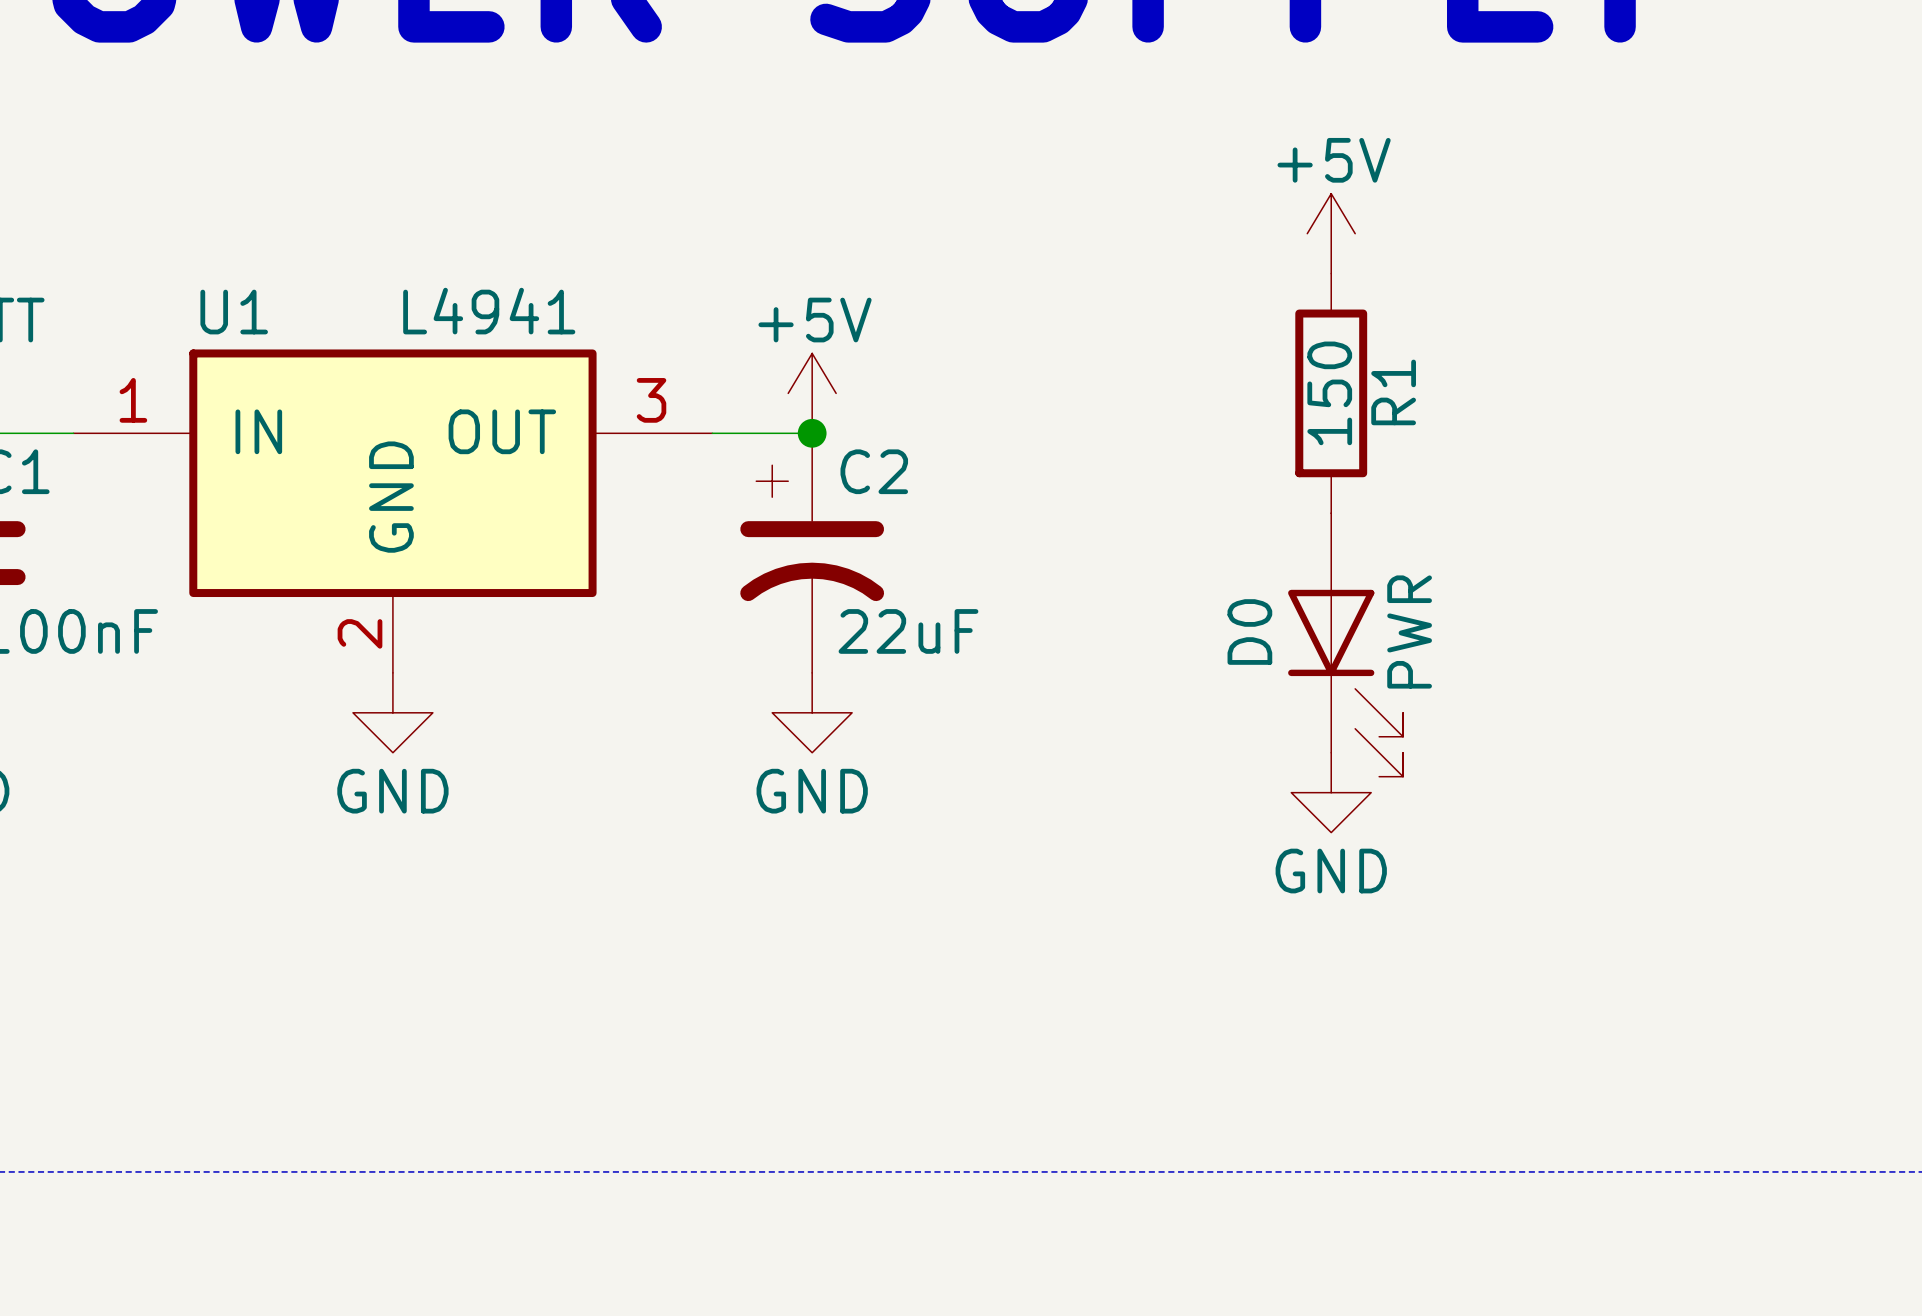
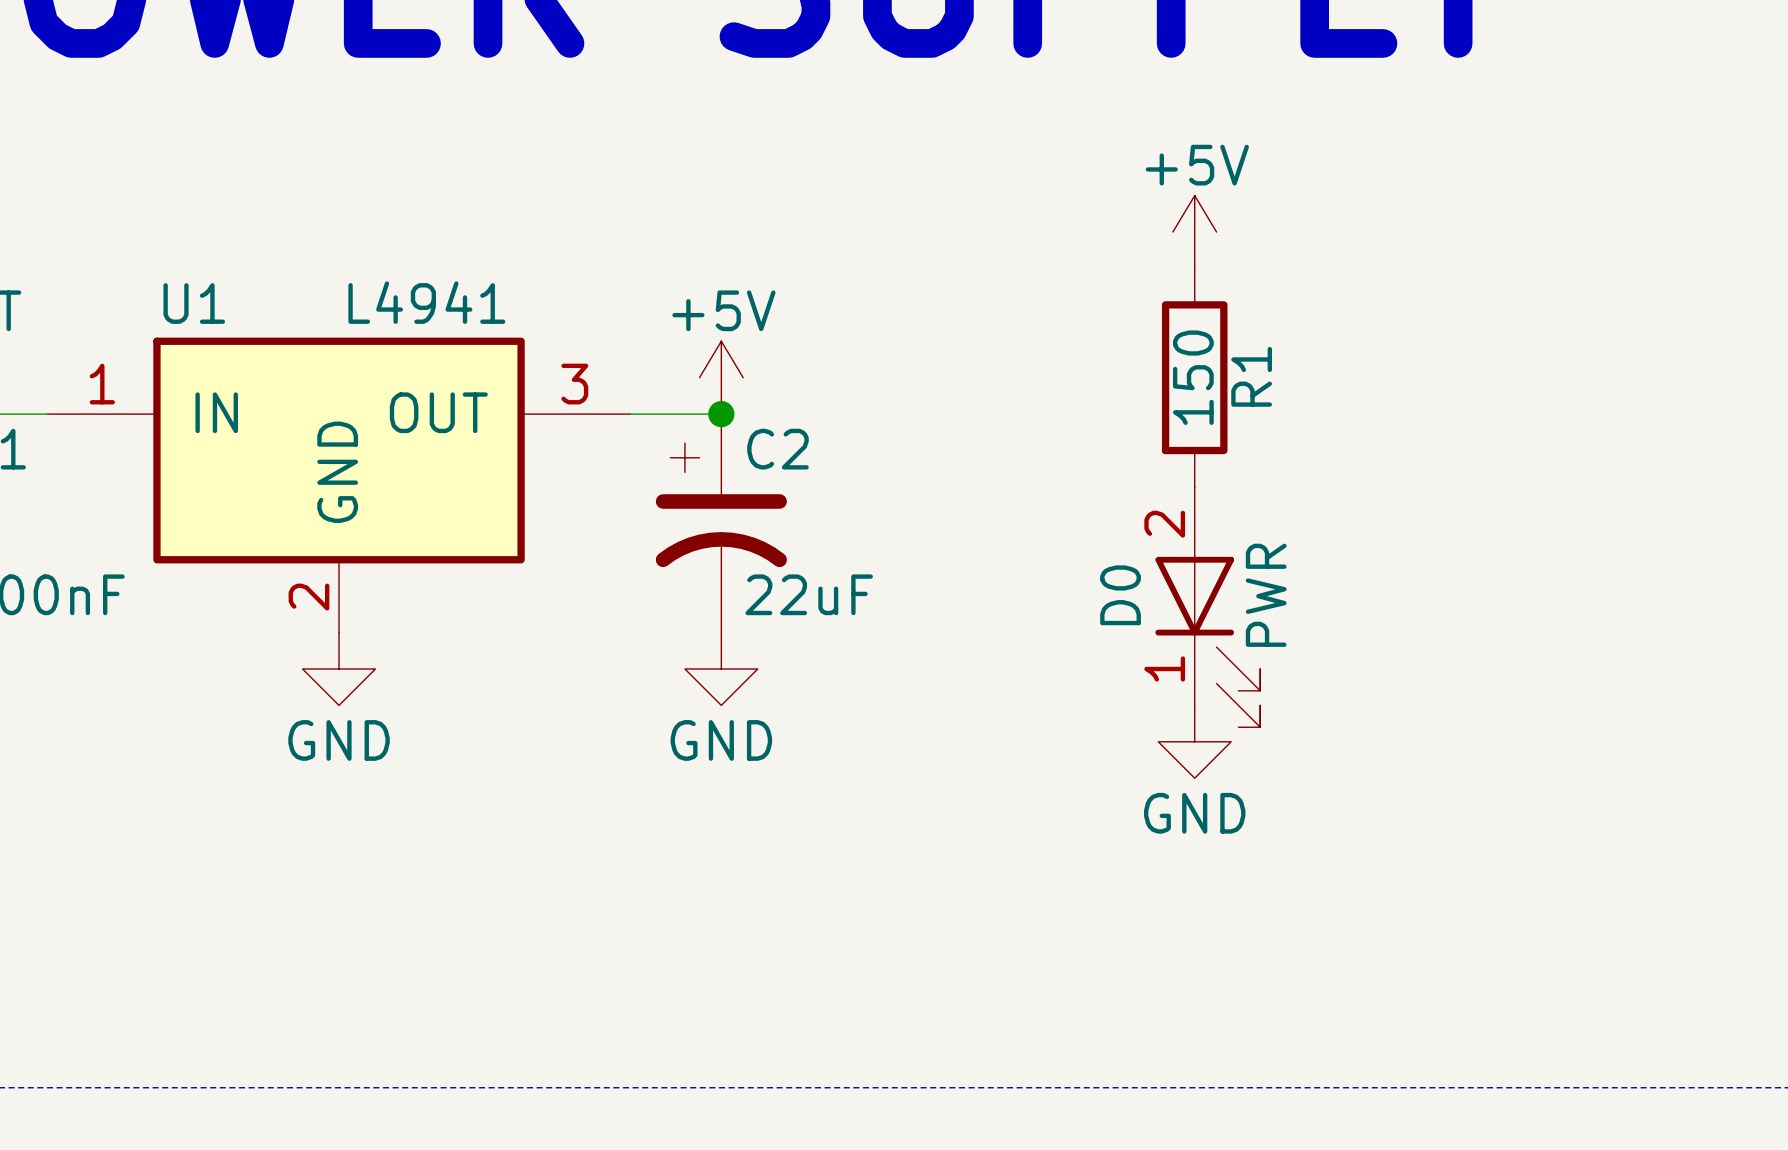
D0 pin number: none -> 2 (1164, 524)
D0 pin number: none -> 1 (1164, 668)

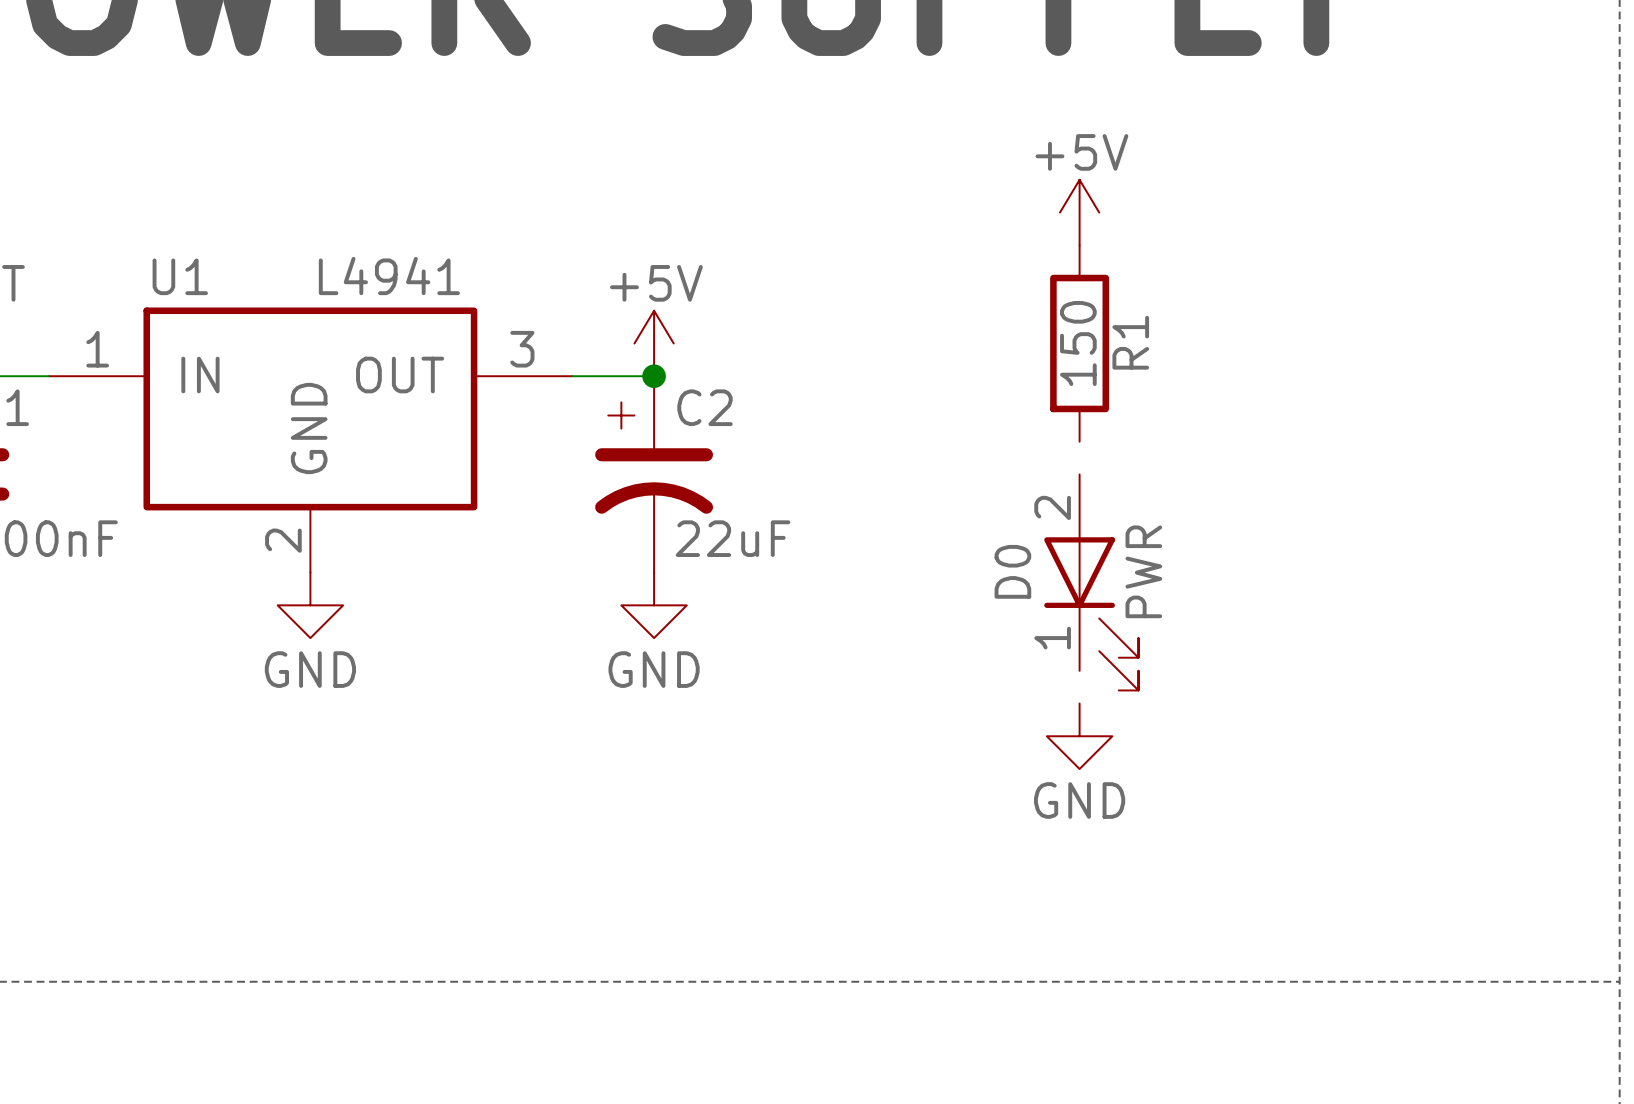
D0 position: (1207, 607) -> (1091, 582)
power symbol position: GND (1194, 741) -> GND (1079, 736)

